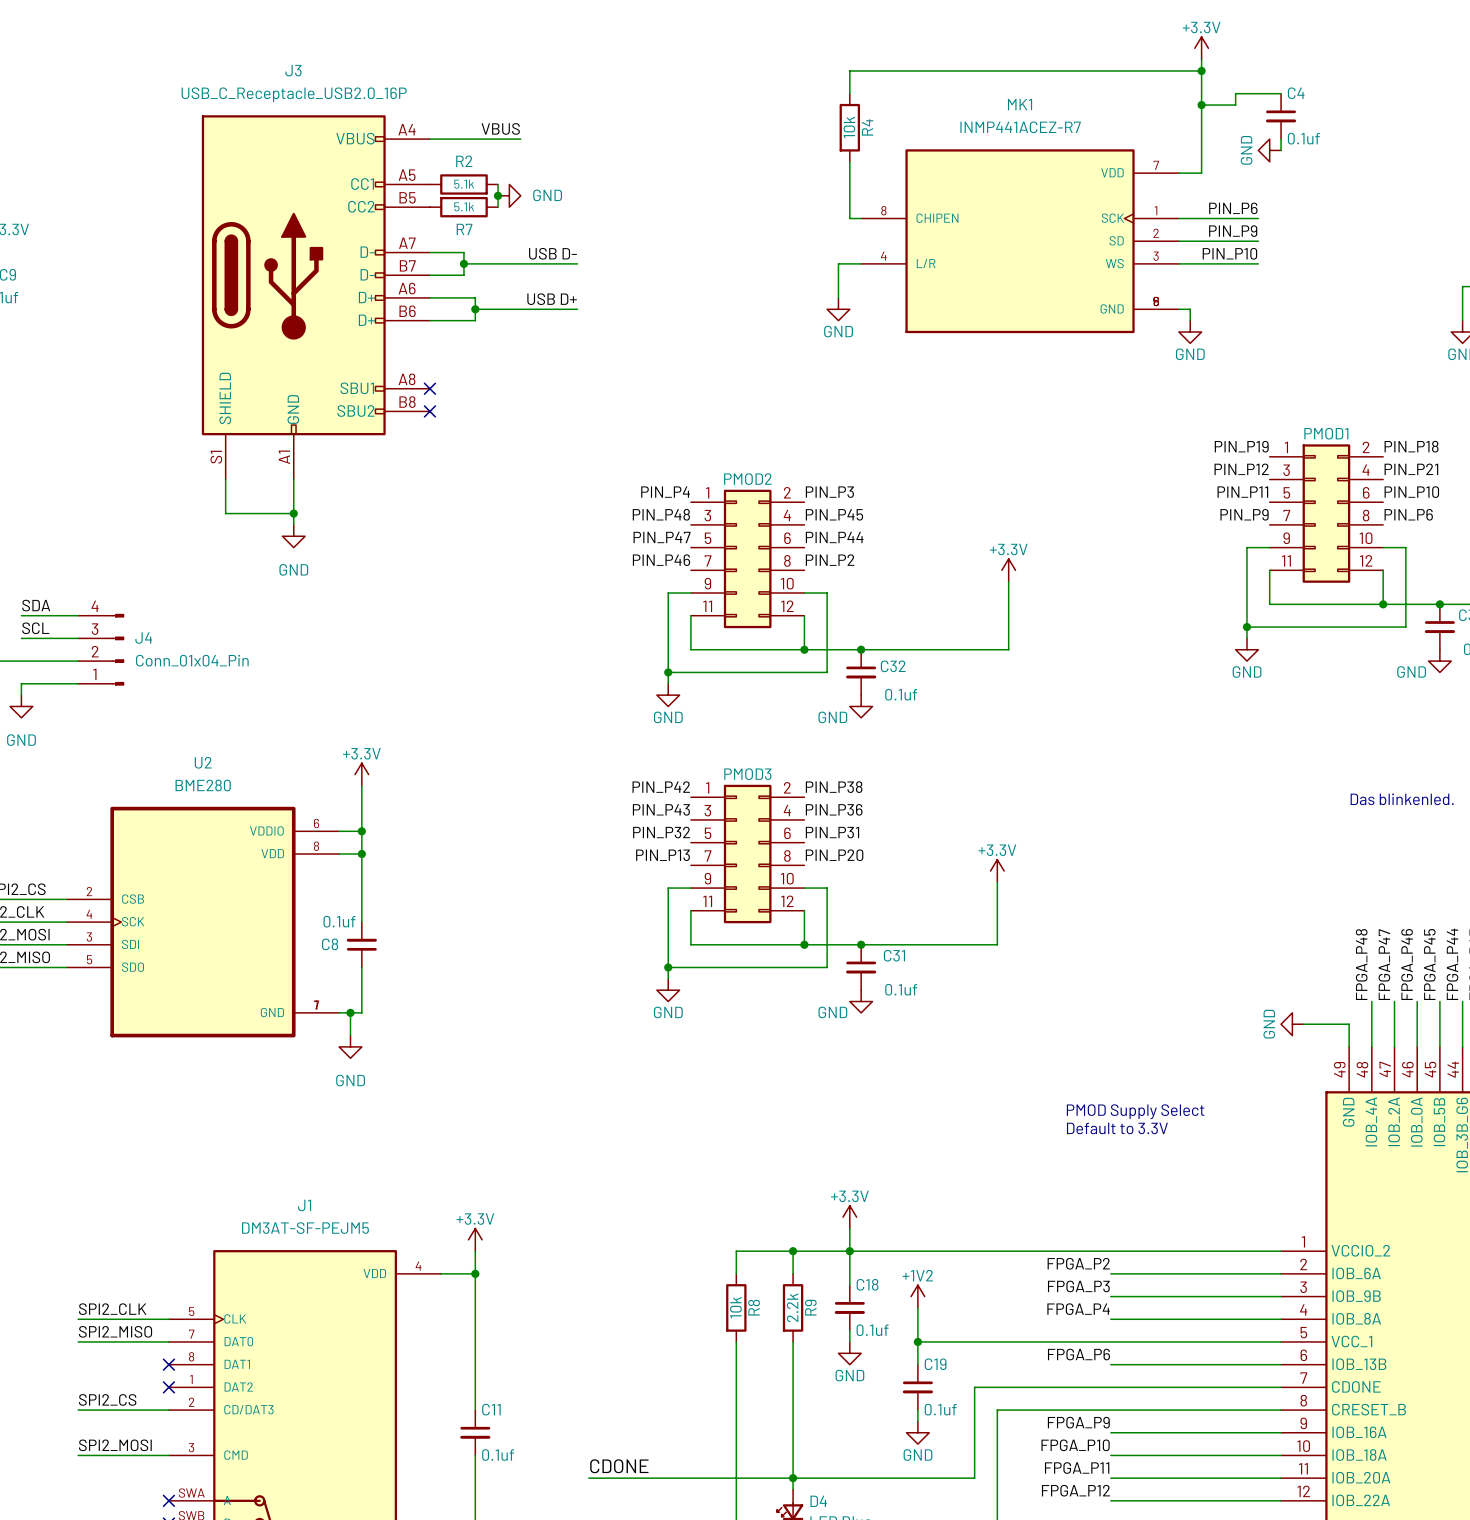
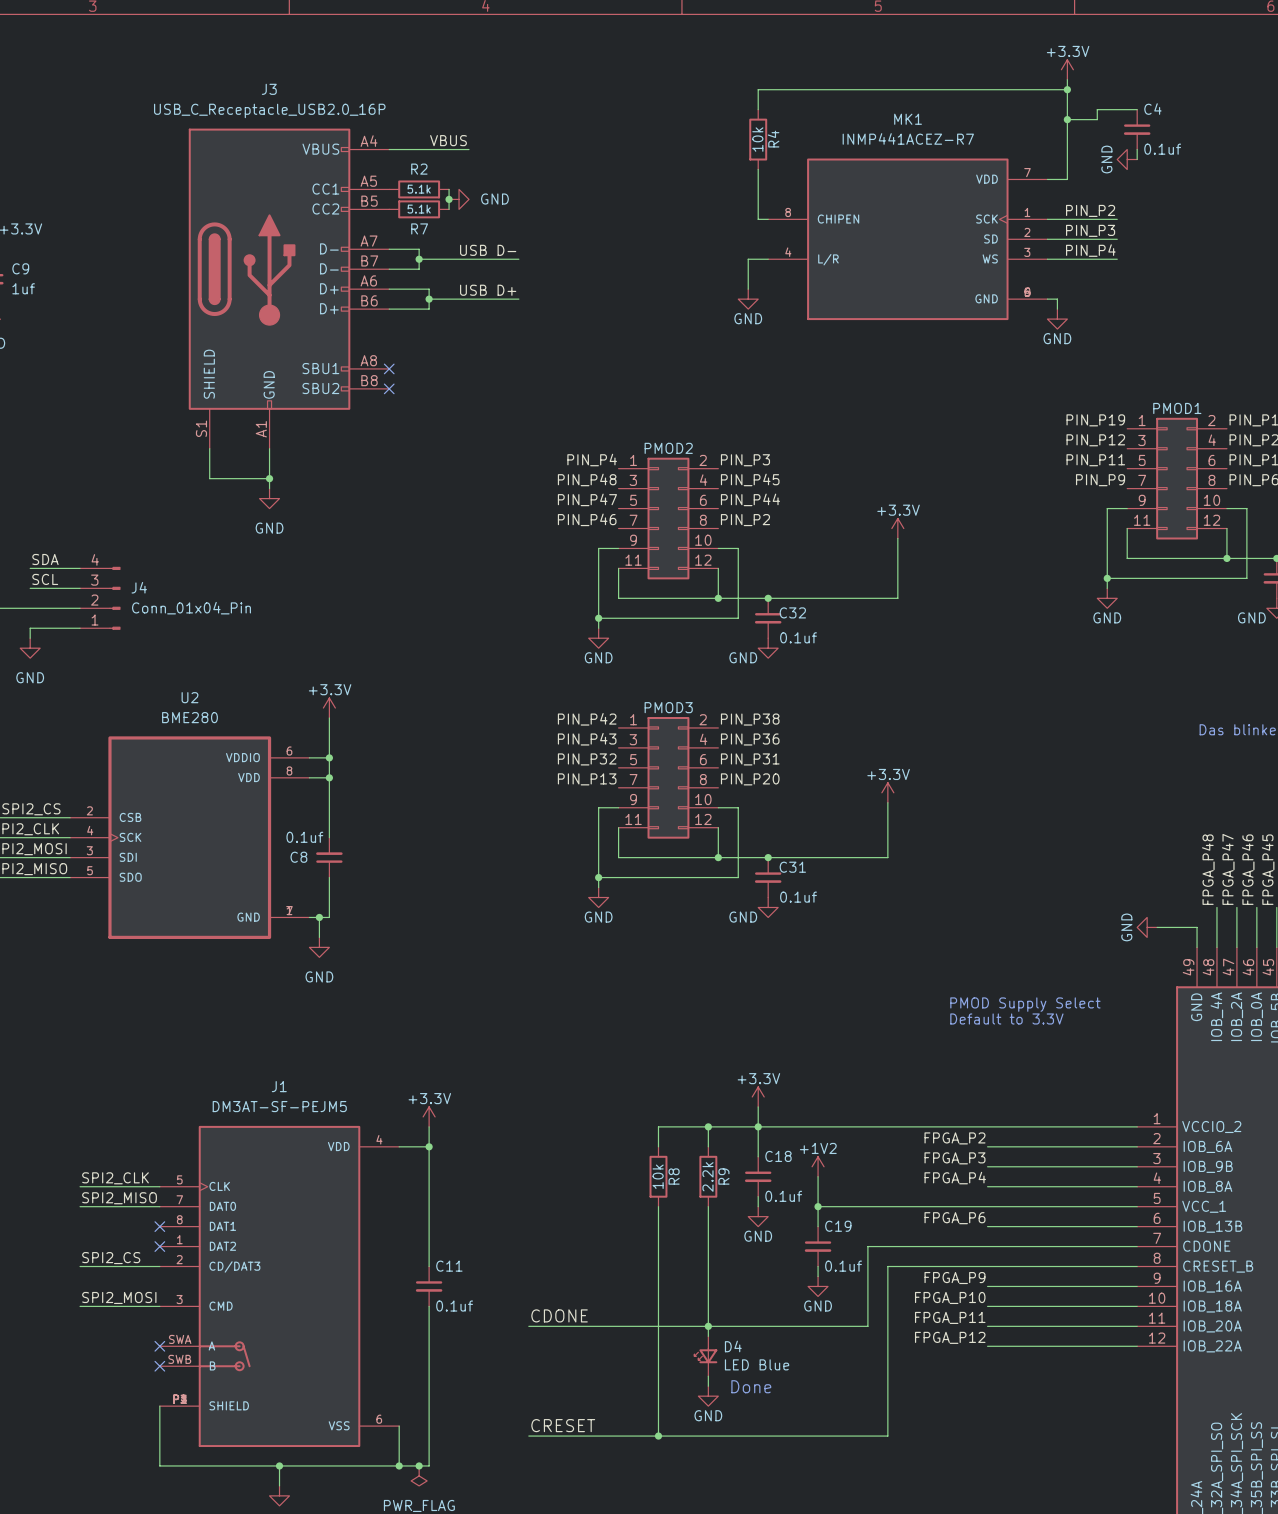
label: PIN_P6 (1233, 208) -> PIN_P2 (1090, 210)
label: PIN_P9 (1233, 231) -> PIN_P3 (1090, 230)
label: PIN_P10 (1229, 253) -> PIN_P4 (1090, 250)

